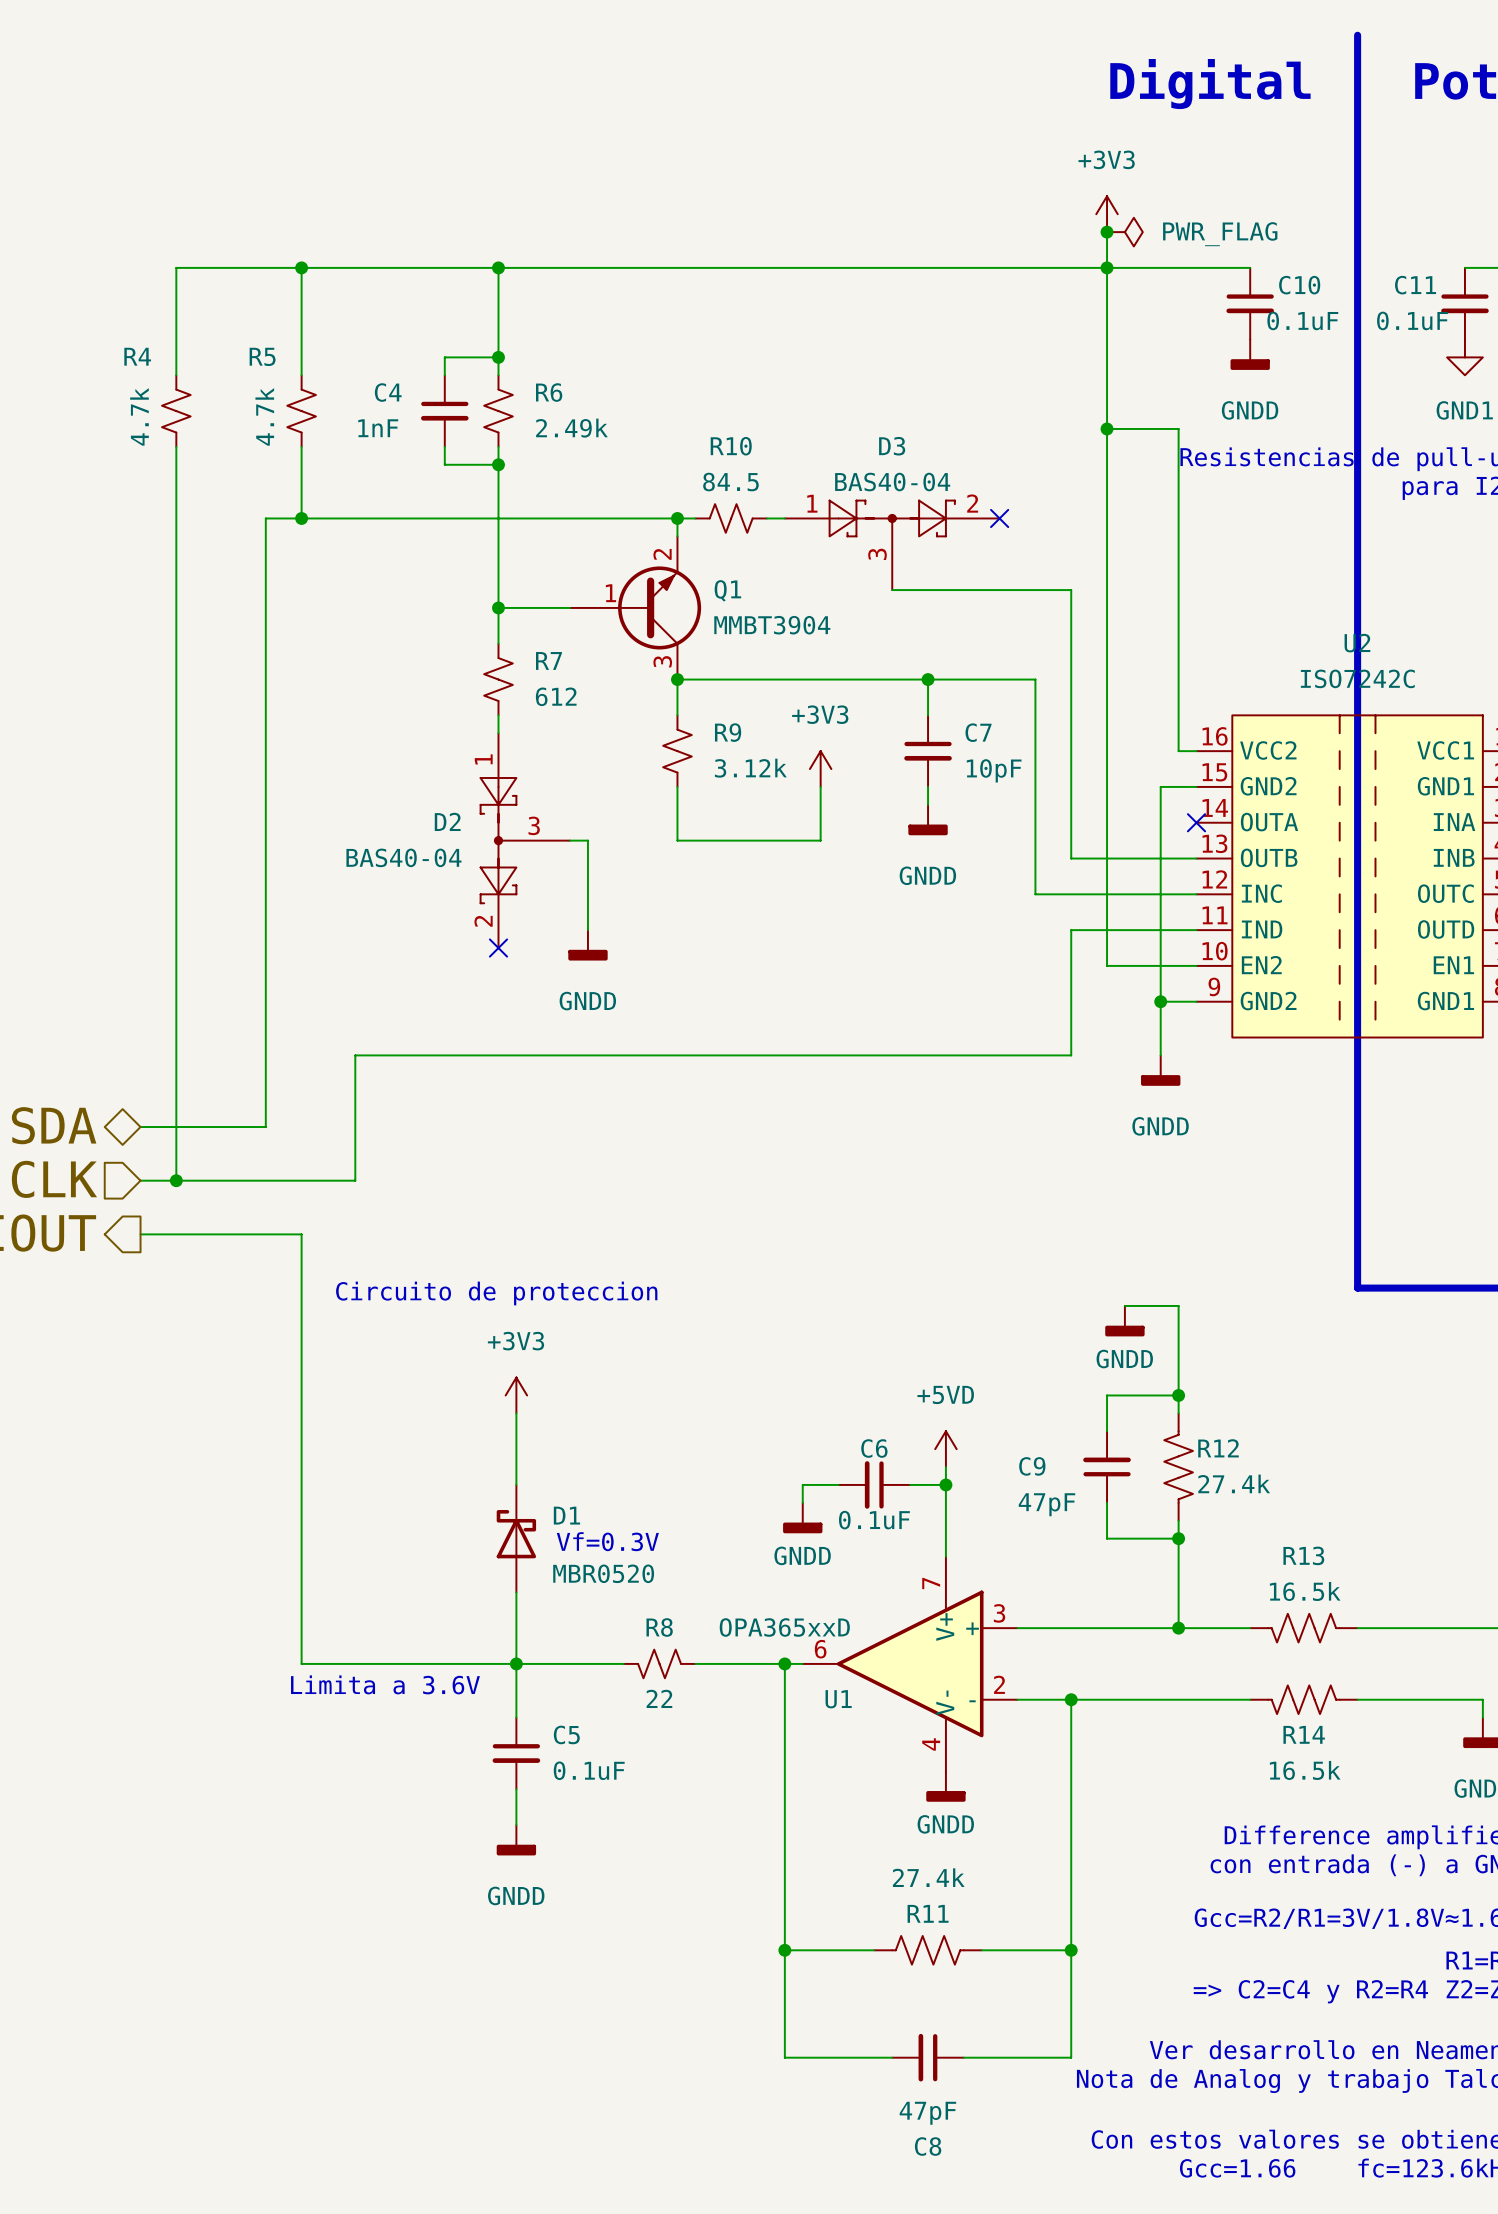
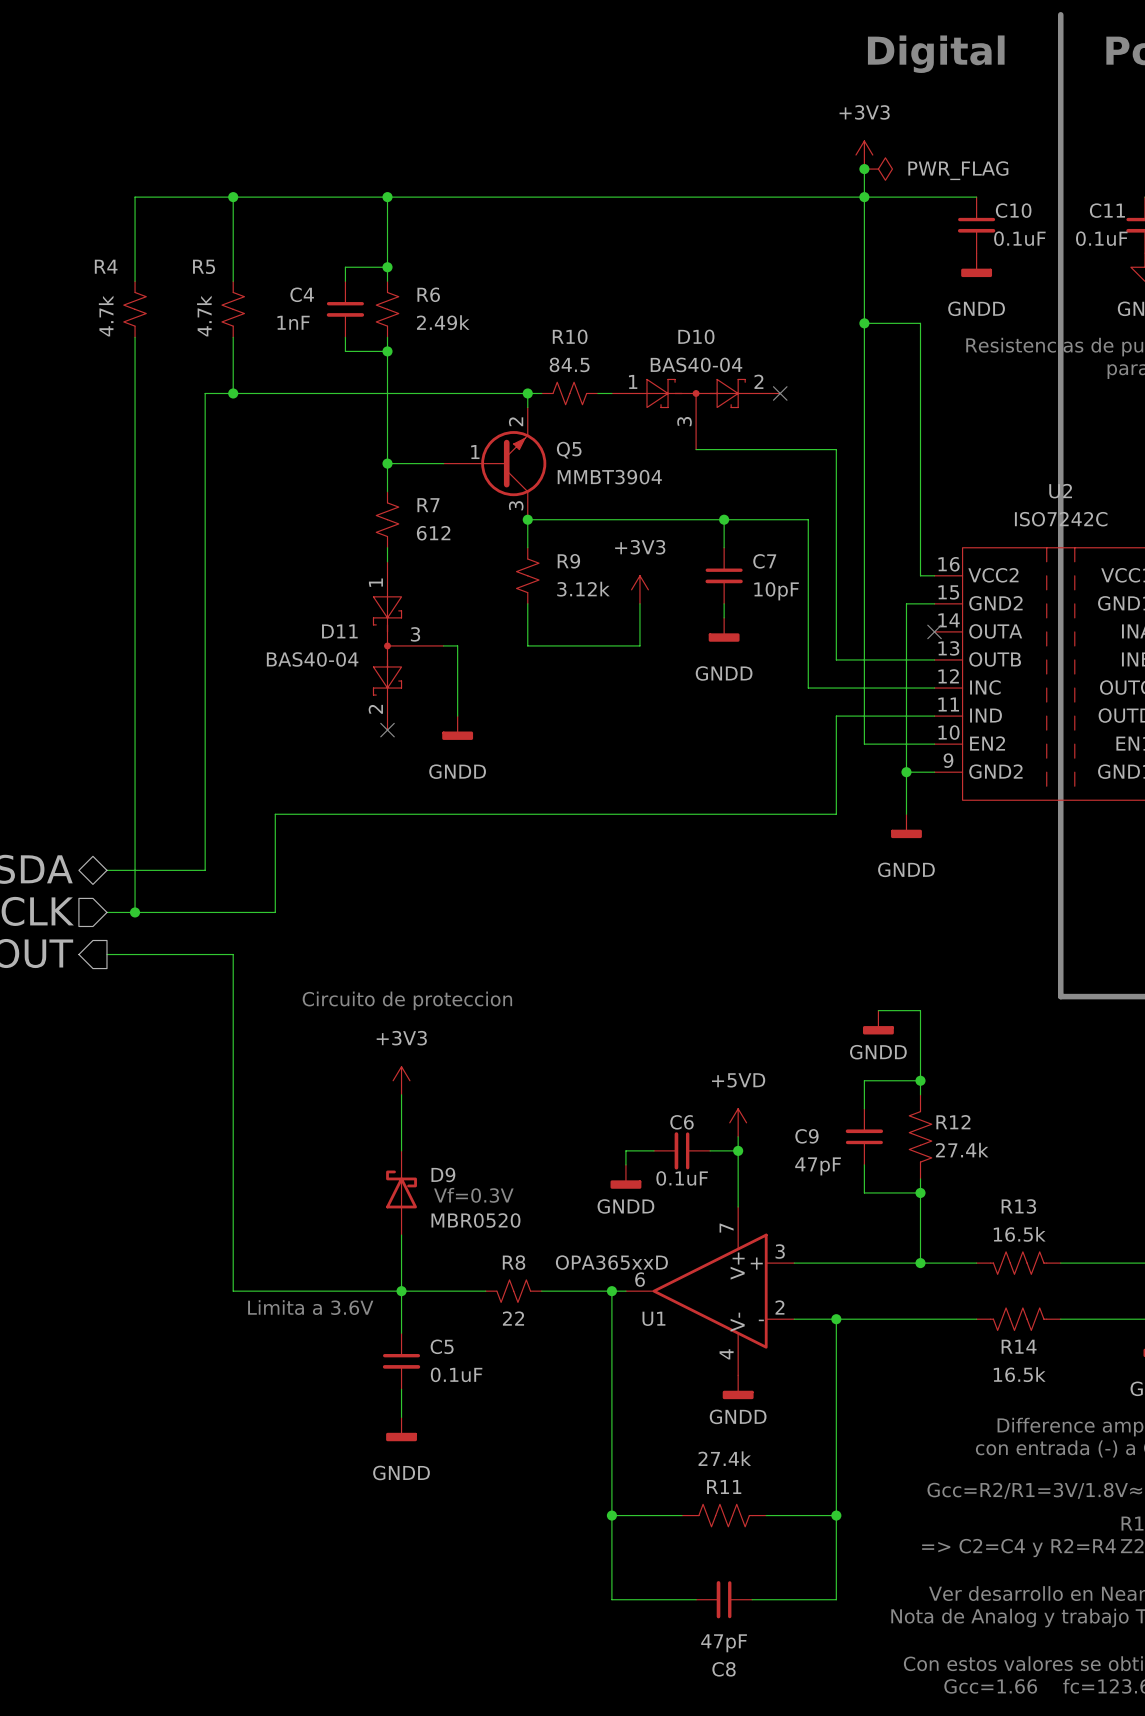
D3 name: D3 (892, 446) -> D10 (696, 336)
Q1 name: Q1 (727, 590) -> Q5 (569, 450)
D2 name: D2 (447, 821) -> D11 (339, 631)
D1 name: D1 (566, 1515) -> D9 (443, 1174)

